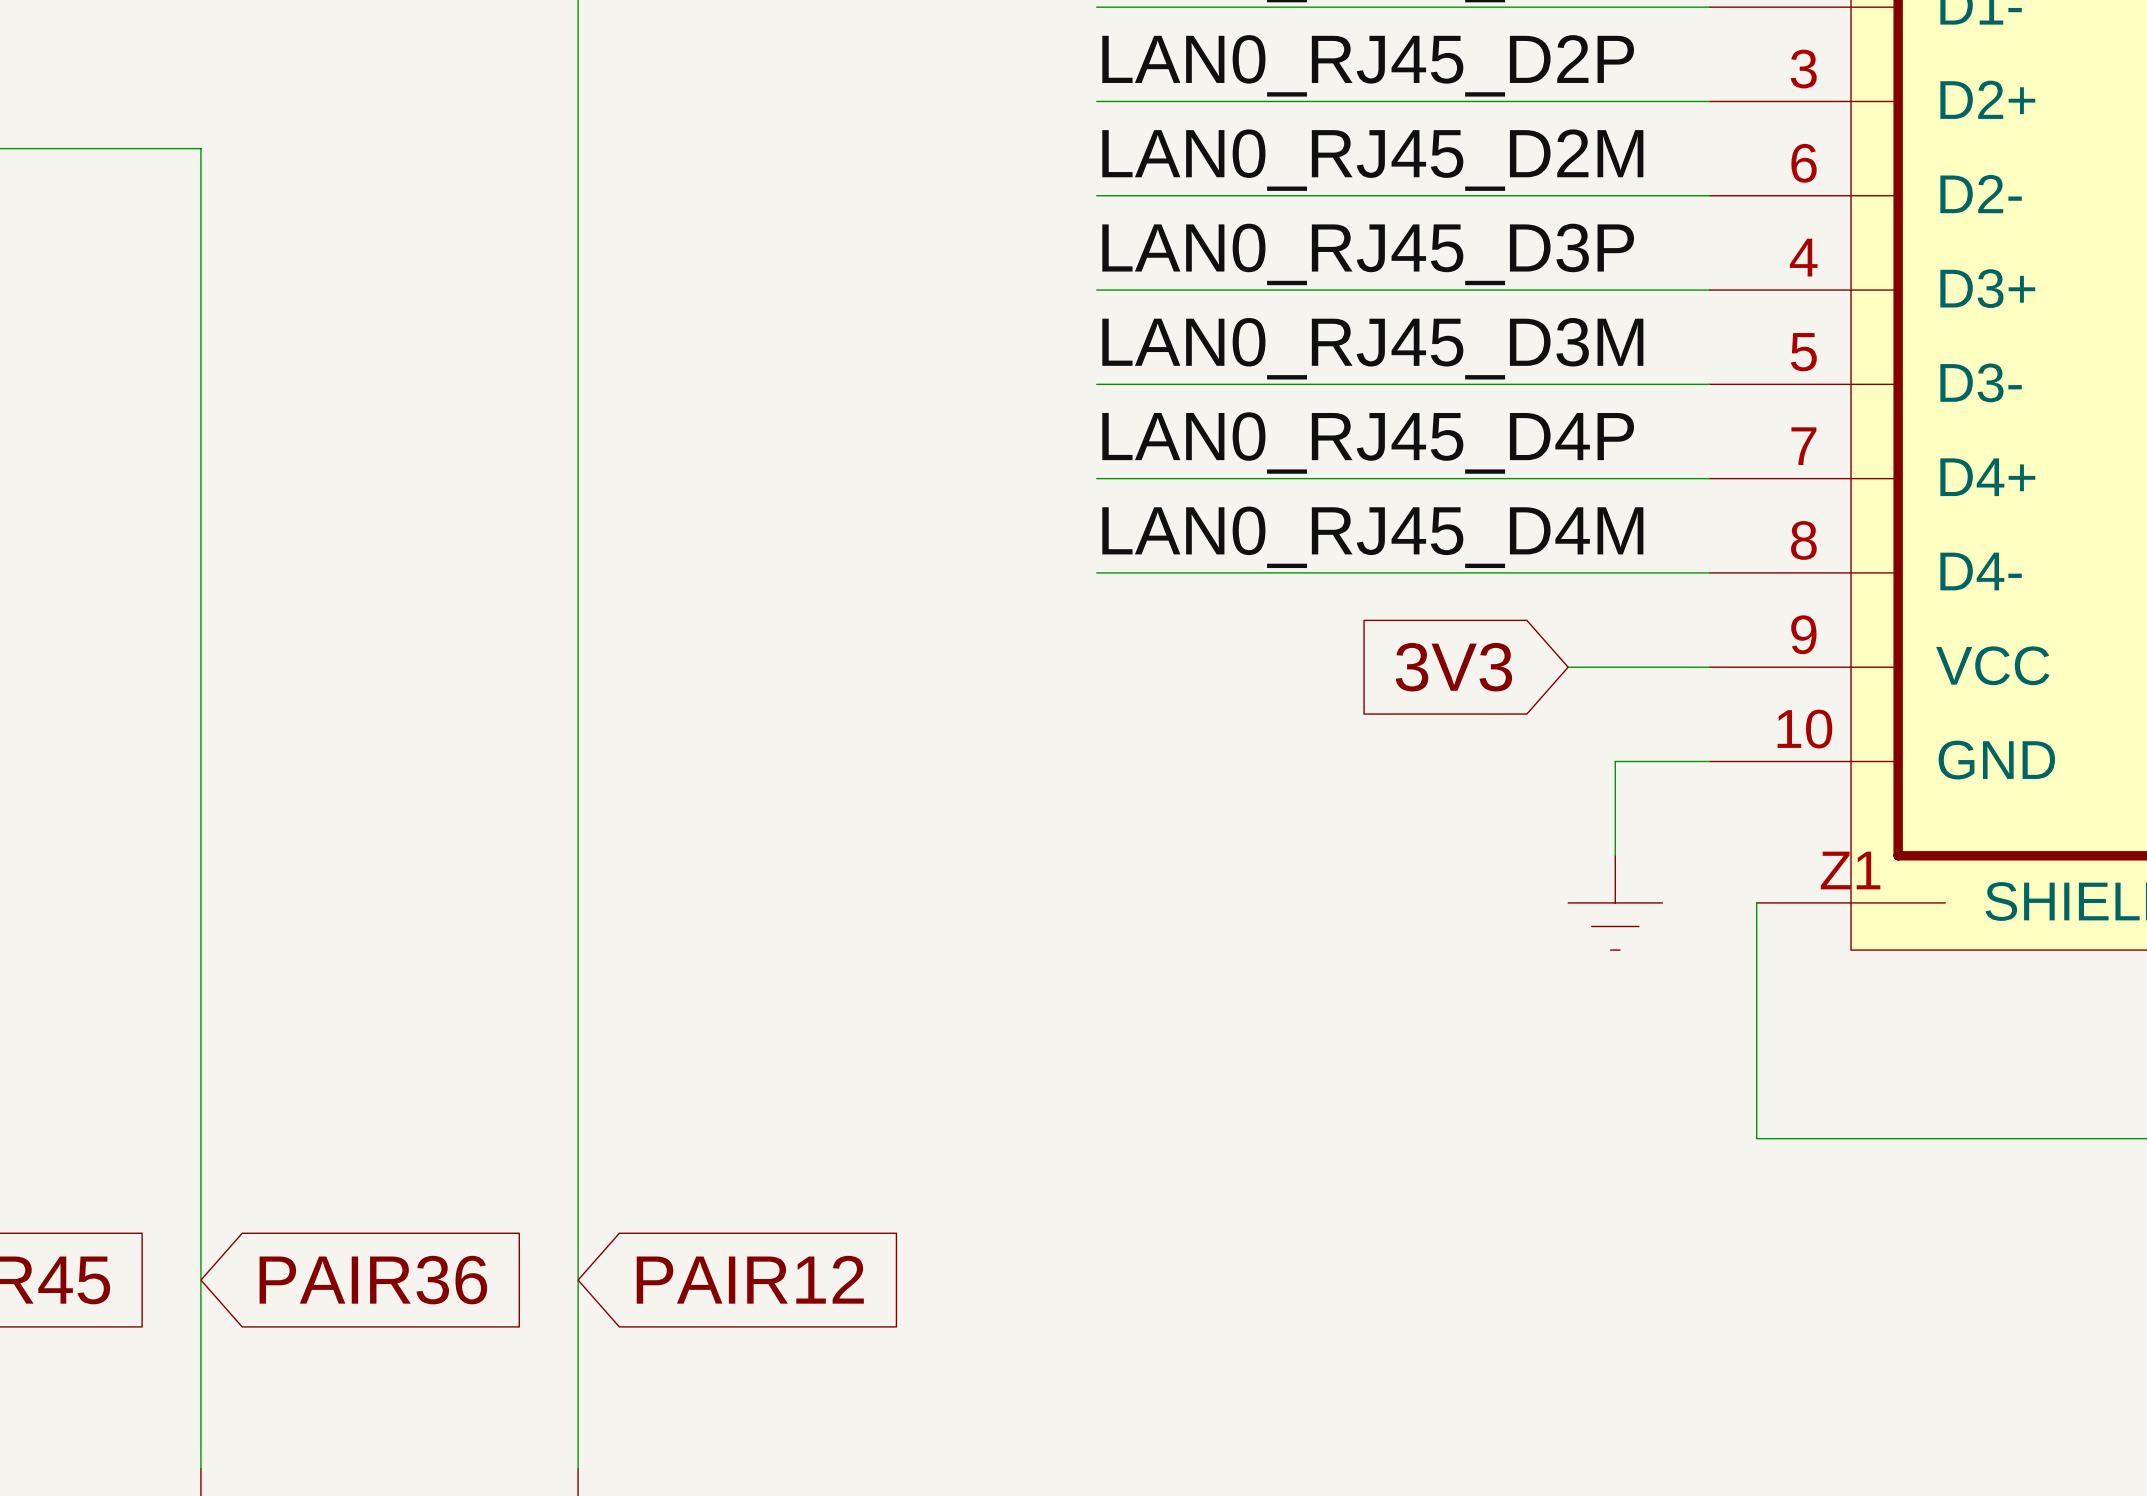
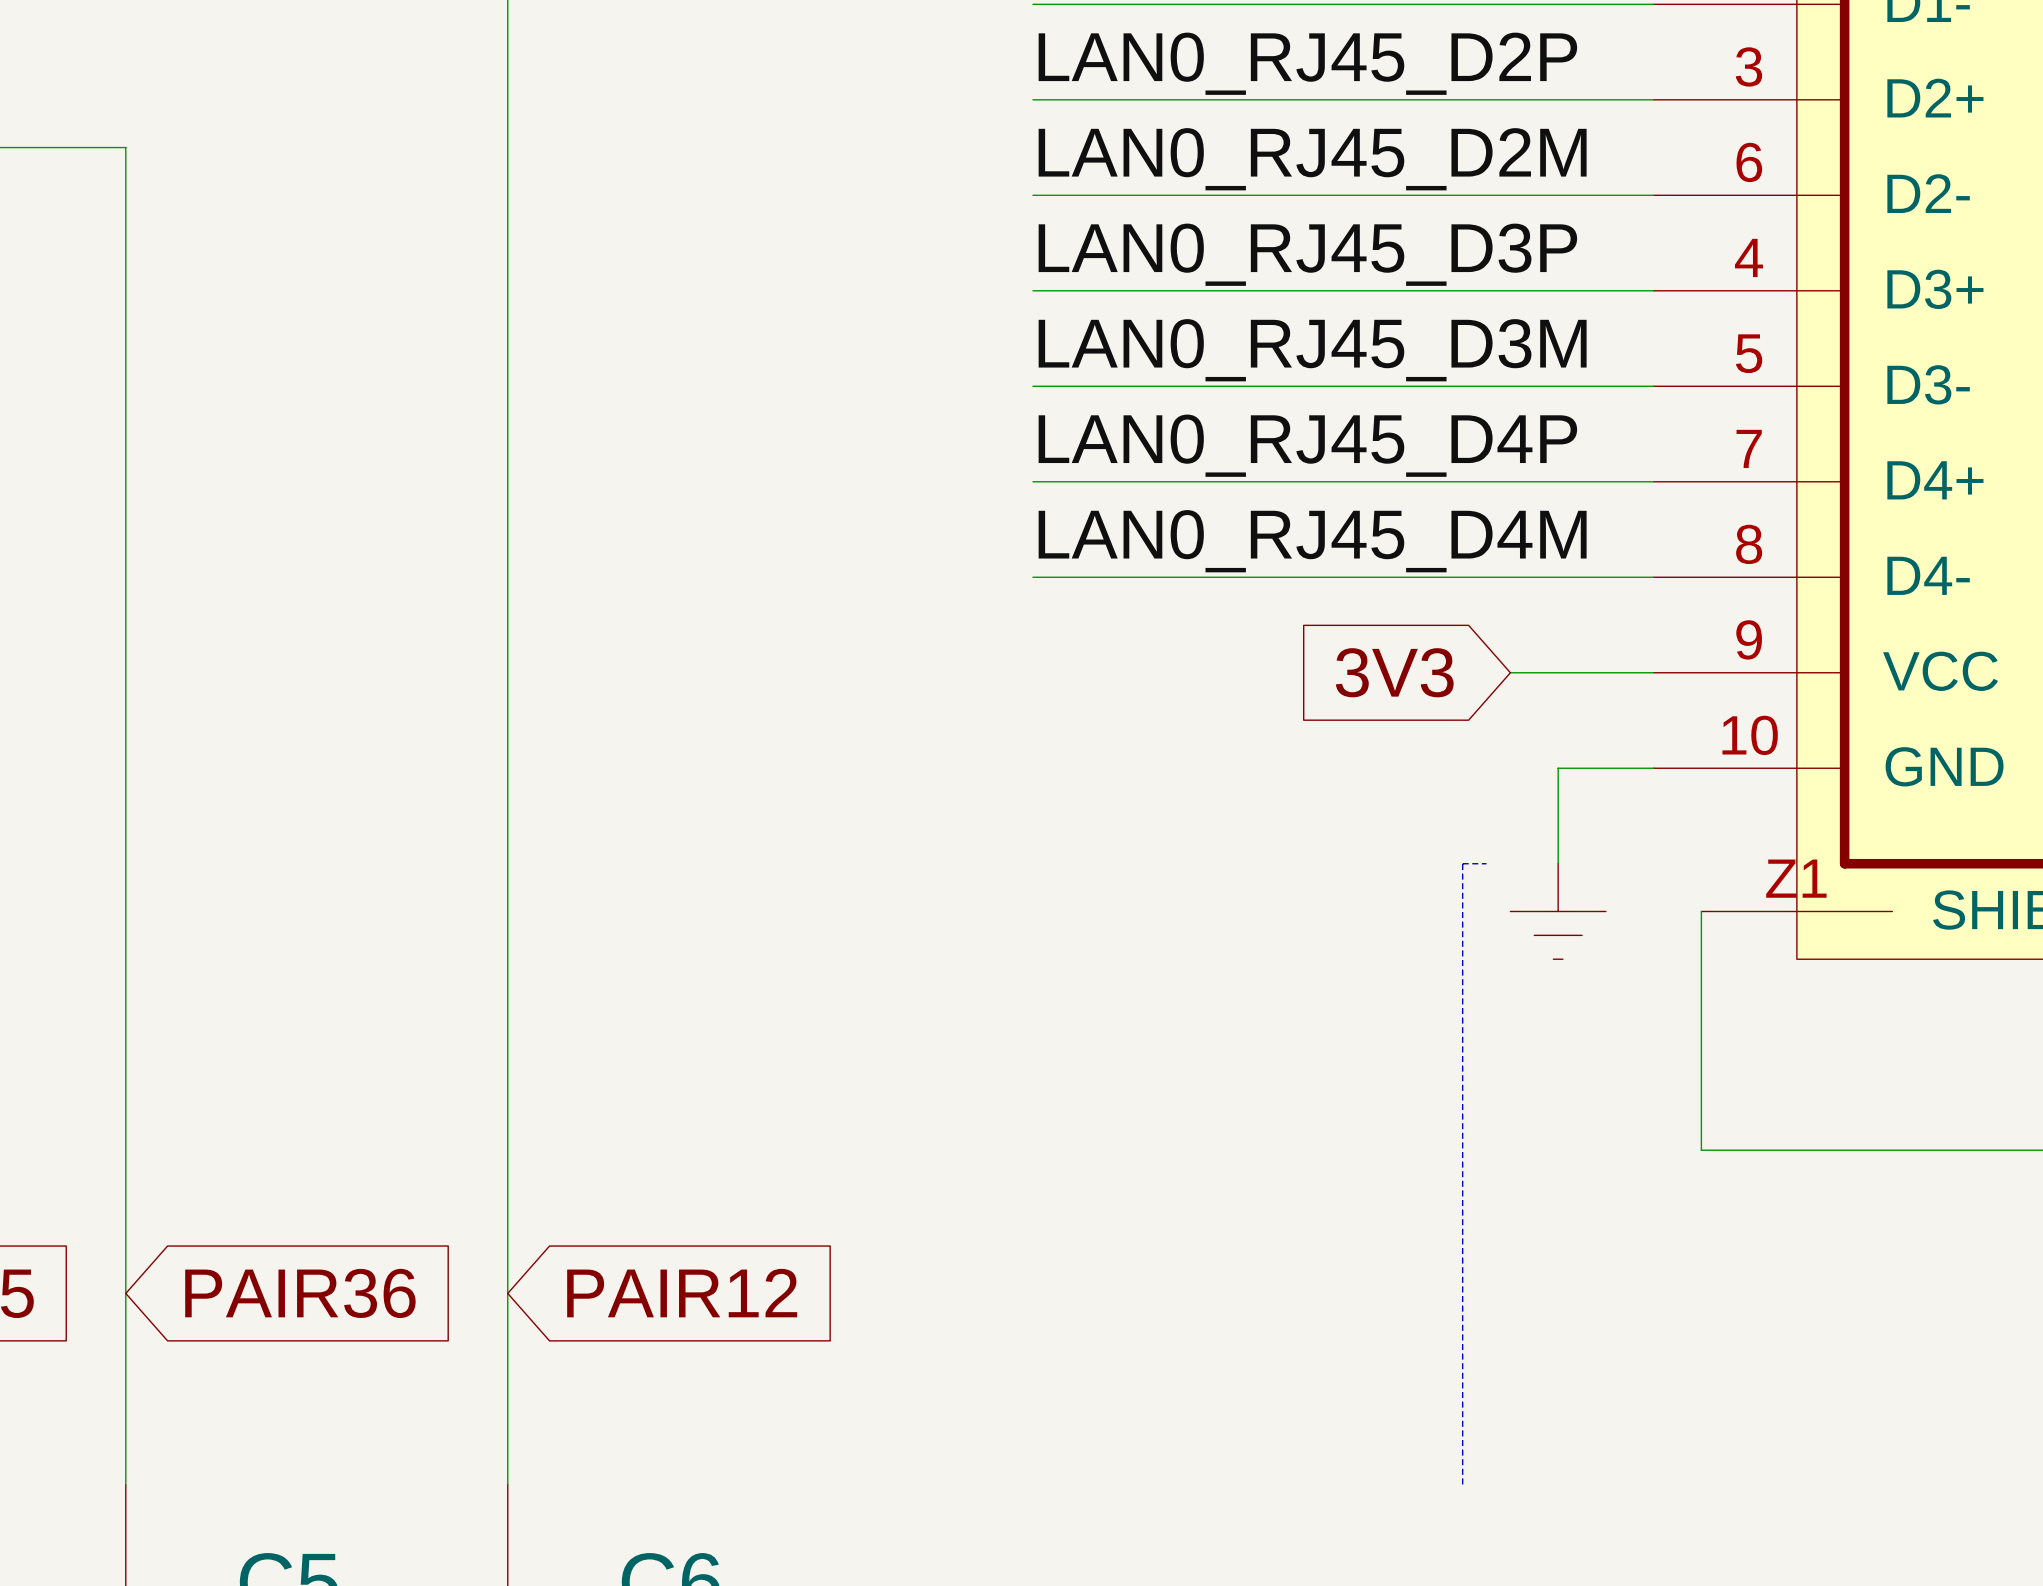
line: none -> (1486, 863) (1462, 863) (1462, 1484)

